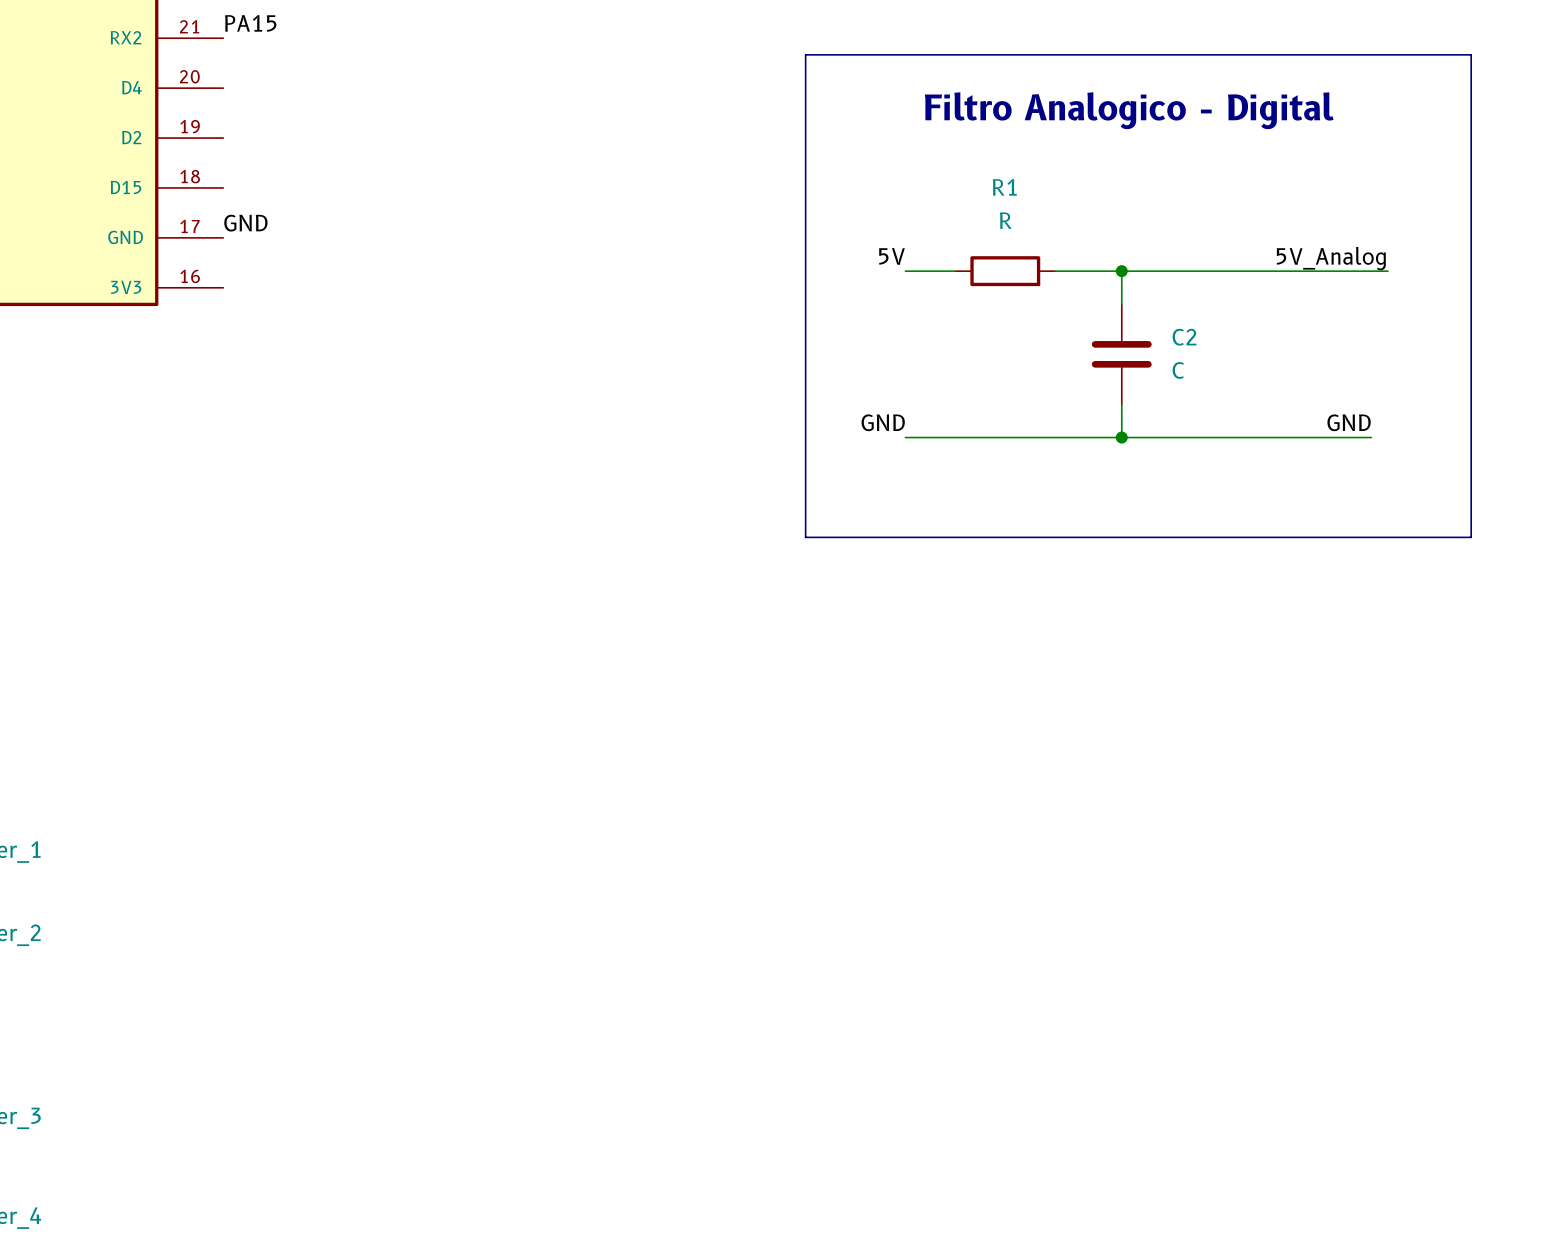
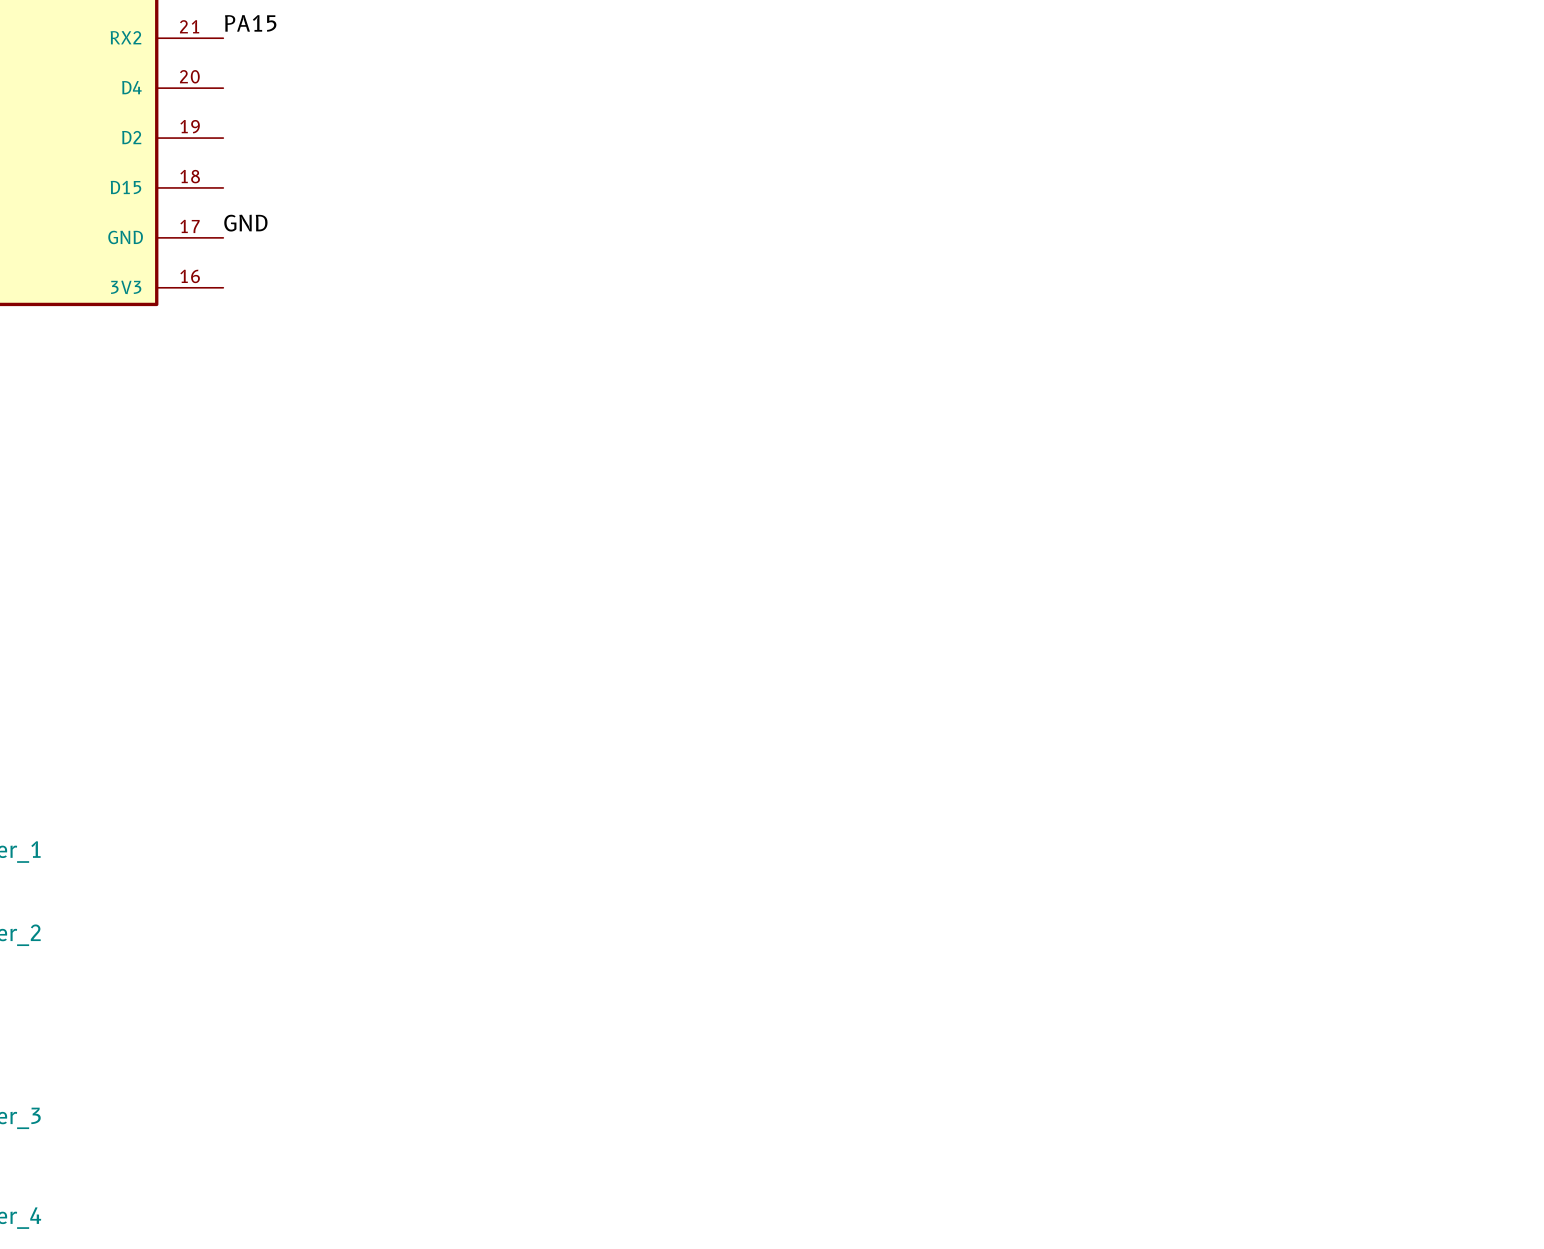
line: (805, 54) (1471, 54) (1471, 537) (805, 537) (805, 54) -> none
text: Filtro Analogico - Digital (1129, 110) -> none
label: 5V (892, 256) -> none
label: 5V_Analog (1331, 258) -> none
wire: (905, 271) (955, 271) -> none
R1: R (1005, 271) -> none
wire: (1055, 271) (1387, 271) -> none
wire: (1121, 271) (1121, 304) -> none
junction: (1121, 271) -> none
C2: C (1121, 354) -> none
wire: (1121, 404) (1121, 437) -> none
label: GND (883, 422) -> none
label: GND (1349, 422) -> none
wire: (905, 437) (1371, 437) -> none
junction: (1121, 437) -> none

